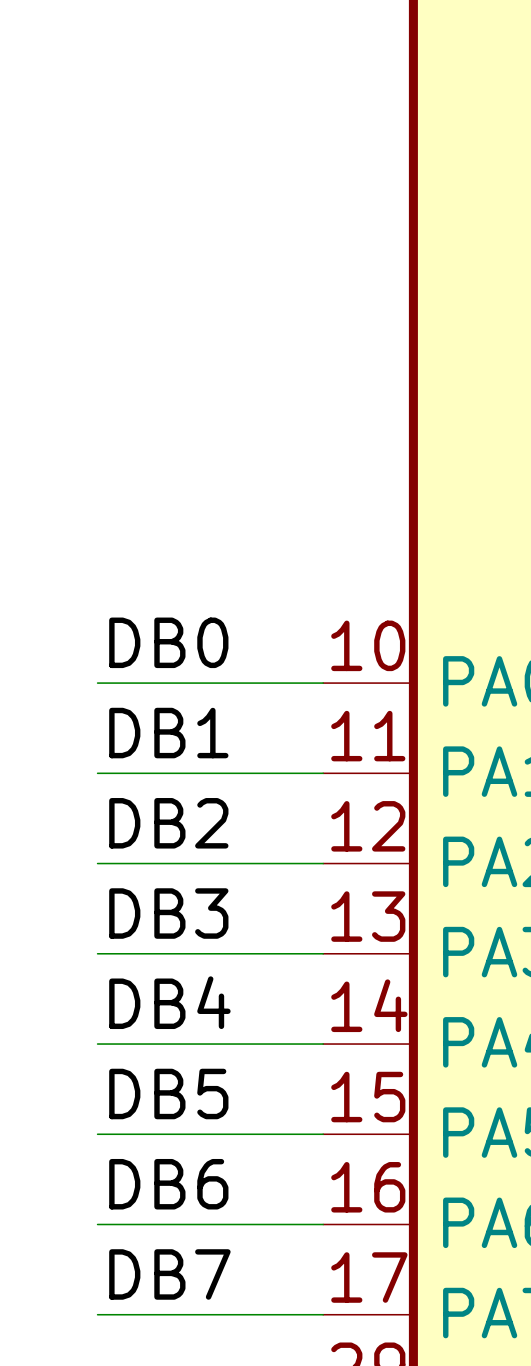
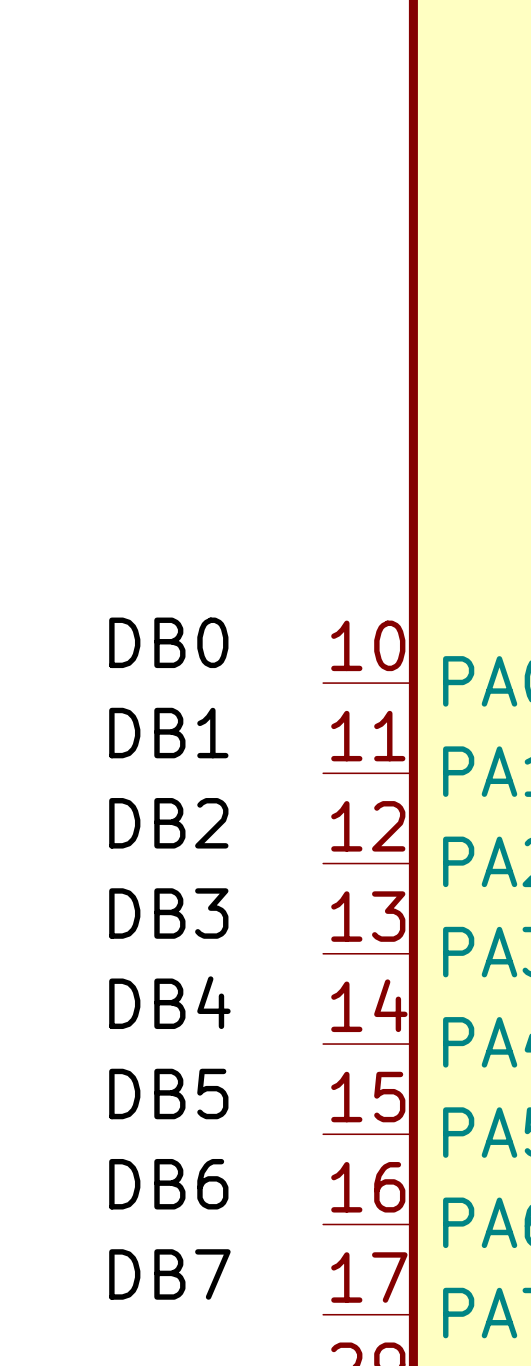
wire: (97, 683) (323, 683) -> none
wire: (97, 773) (323, 773) -> none
wire: (97, 863) (323, 863) -> none
wire: (97, 953) (323, 953) -> none
wire: (97, 1044) (323, 1044) -> none
wire: (97, 1134) (323, 1134) -> none
wire: (97, 1224) (323, 1224) -> none
wire: (97, 1314) (323, 1314) -> none

